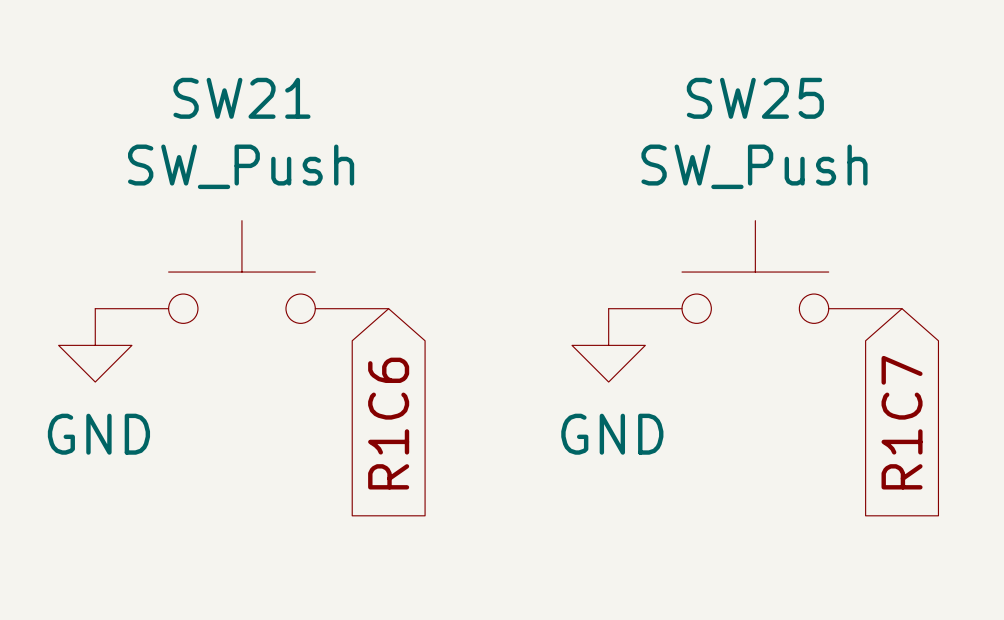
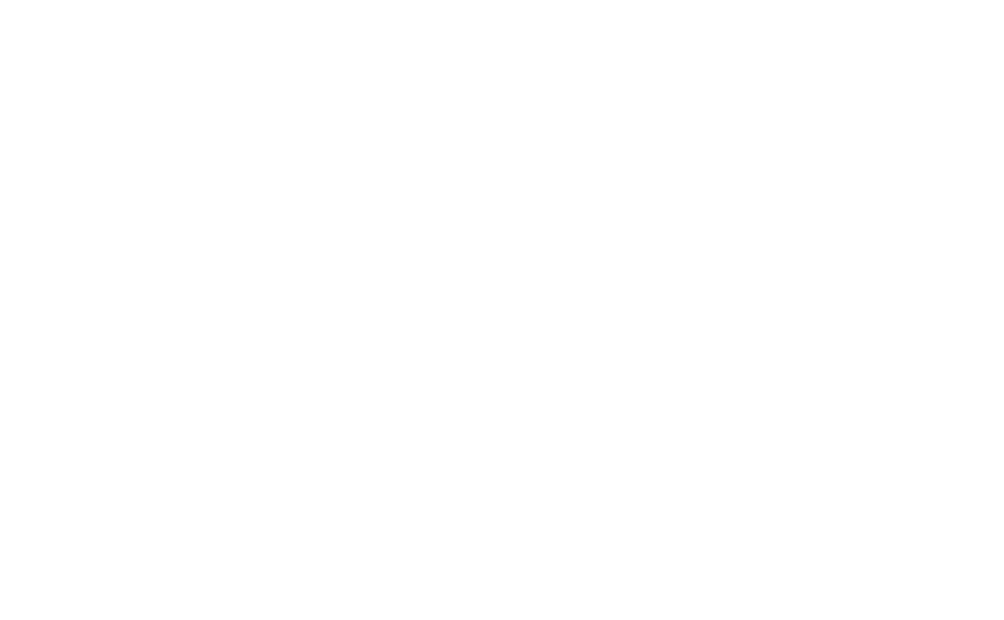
SW21: SW_Push (241, 272) -> none
SW25: SW_Push (755, 272) -> none
power symbol: GND (95, 345) -> none
power symbol: GND (608, 345) -> none
global label: R1C7 (902, 422) -> none
global label: R1C6 (388, 423) -> none

